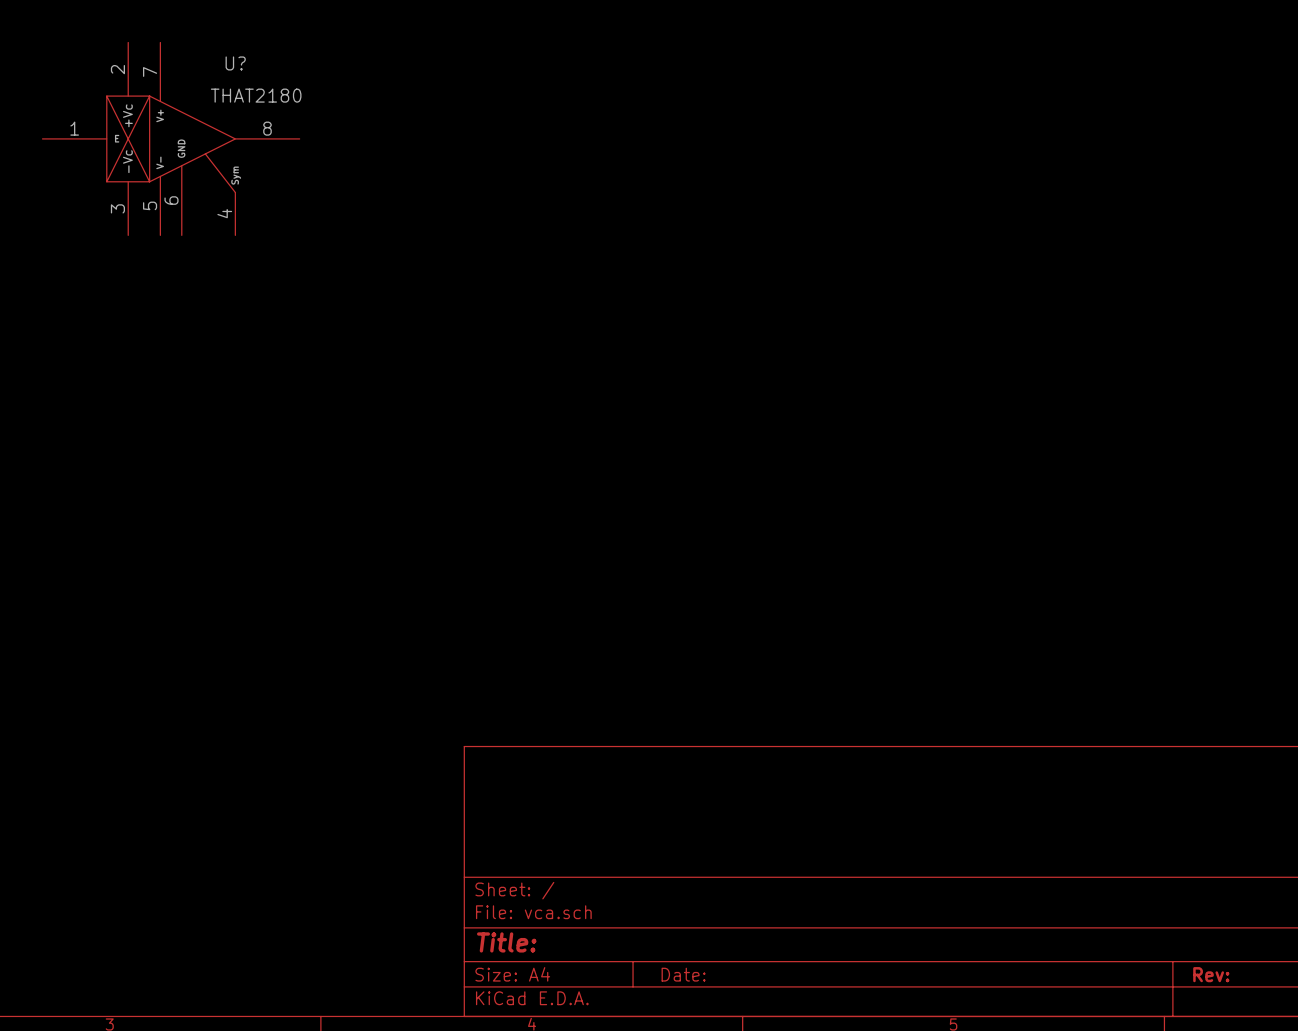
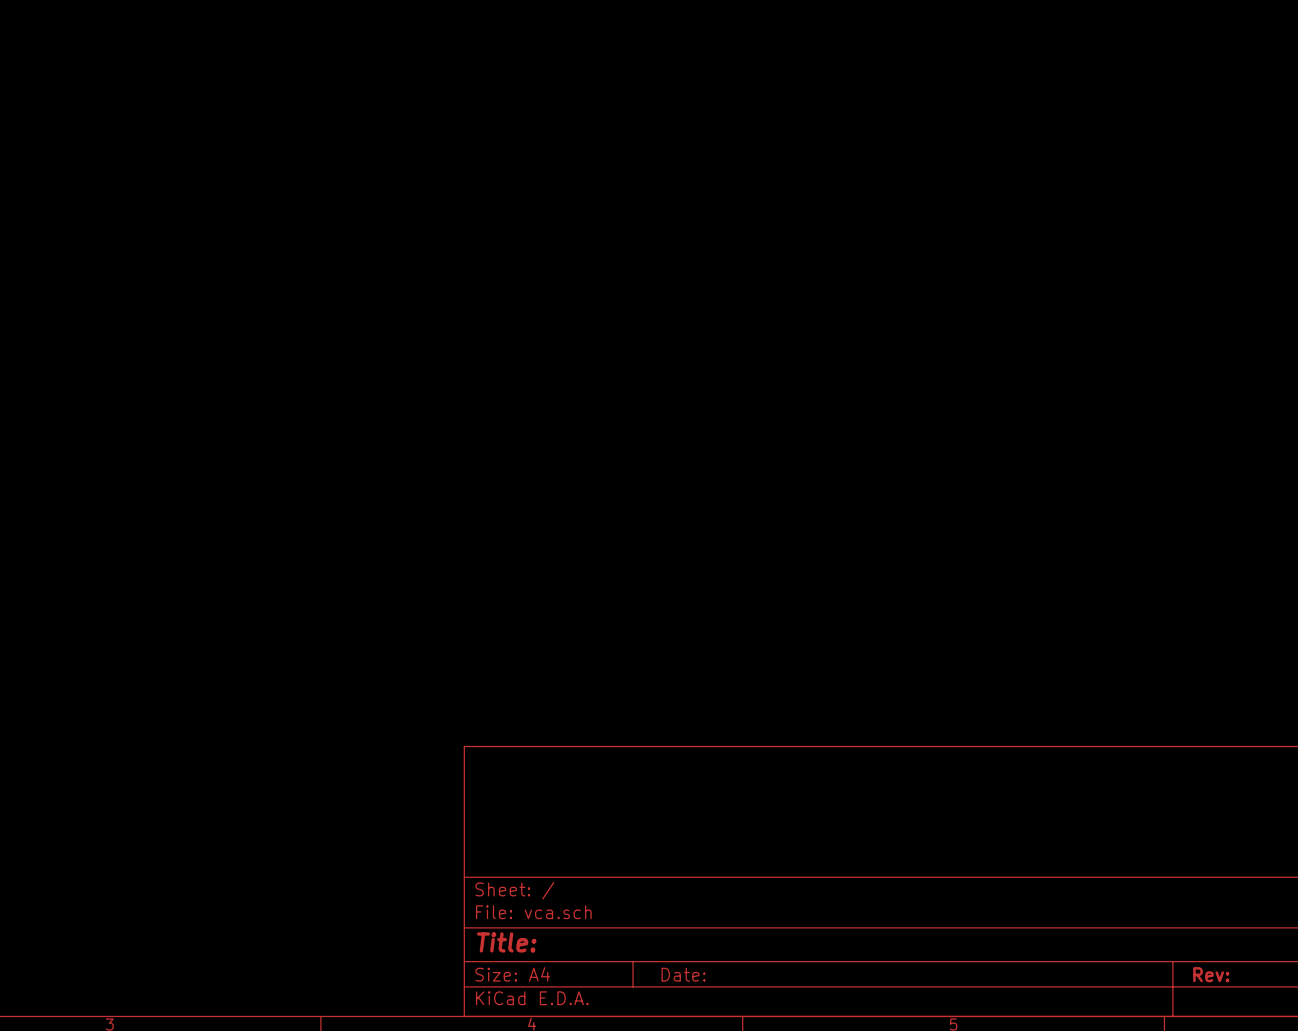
U?: THAT2180 (171, 138) -> none

